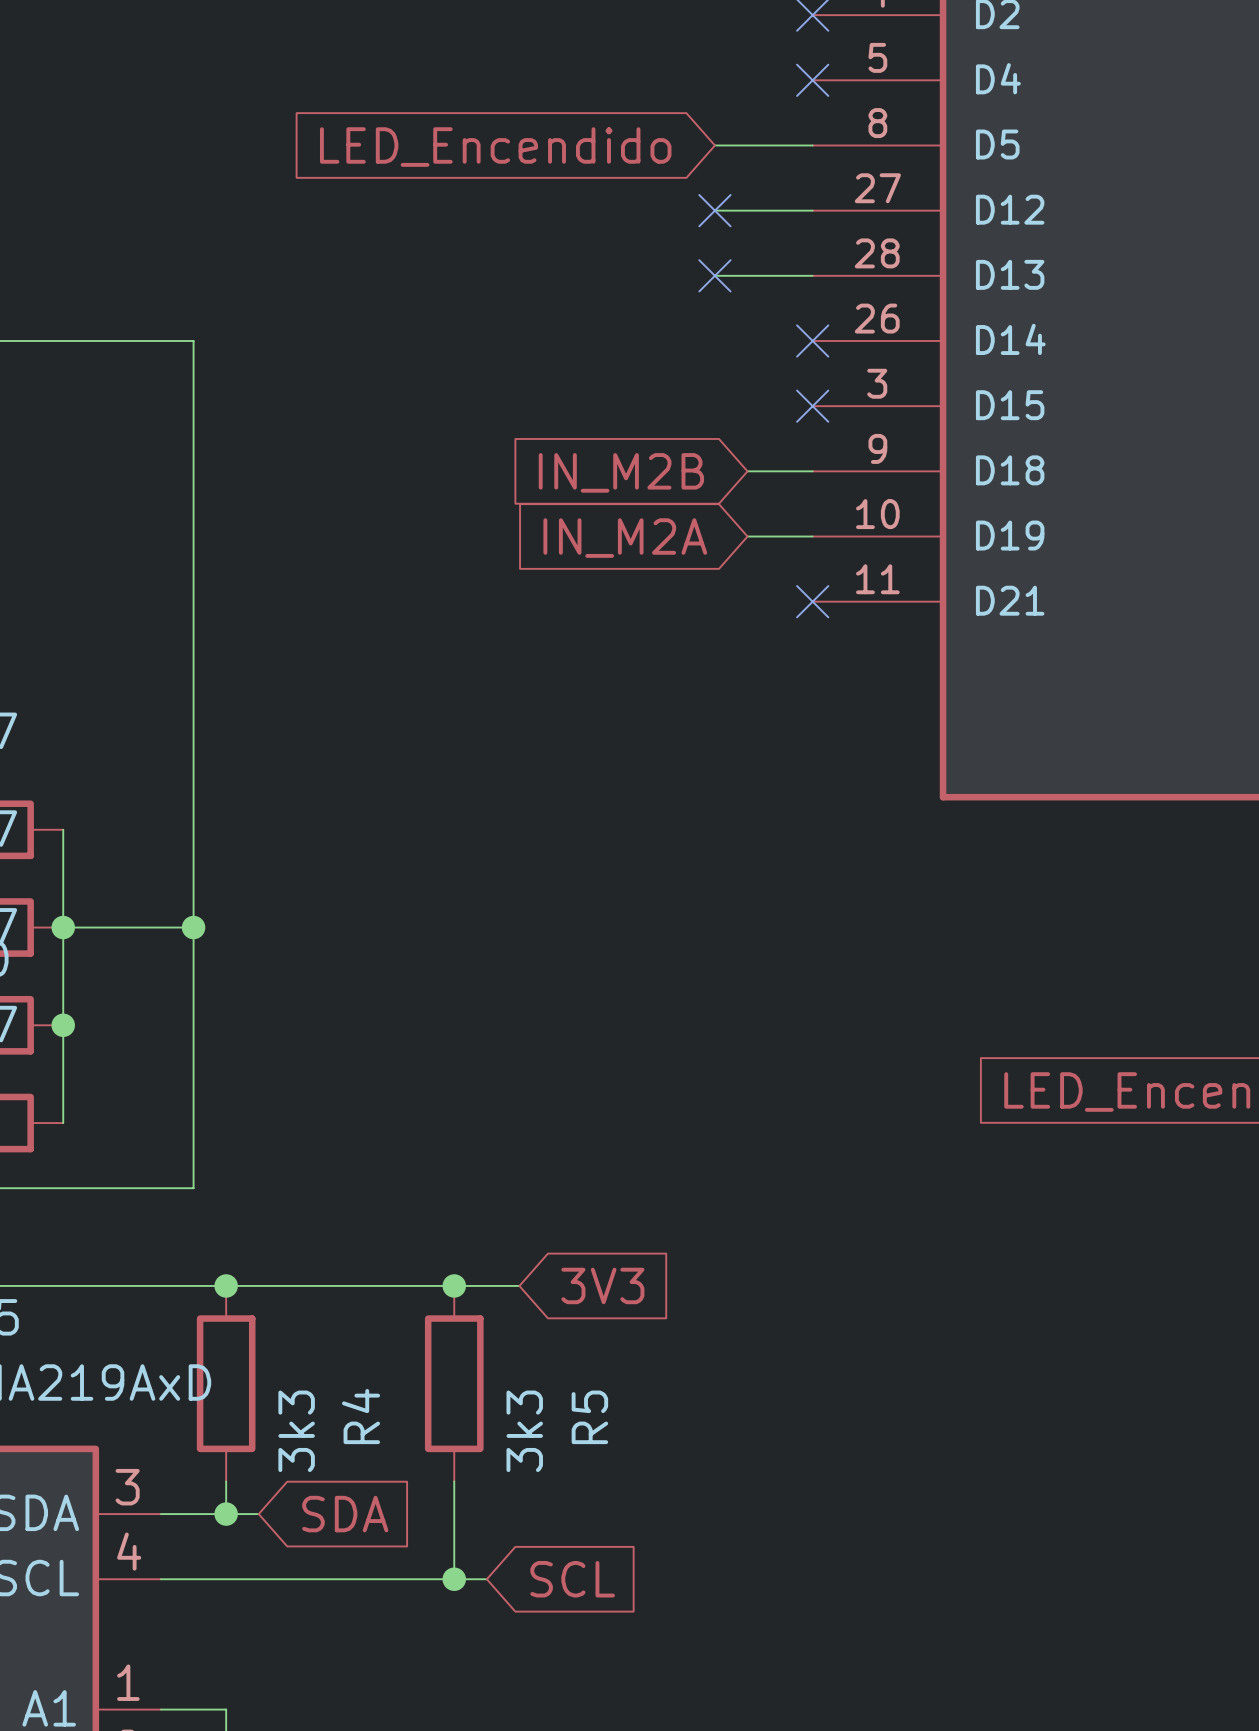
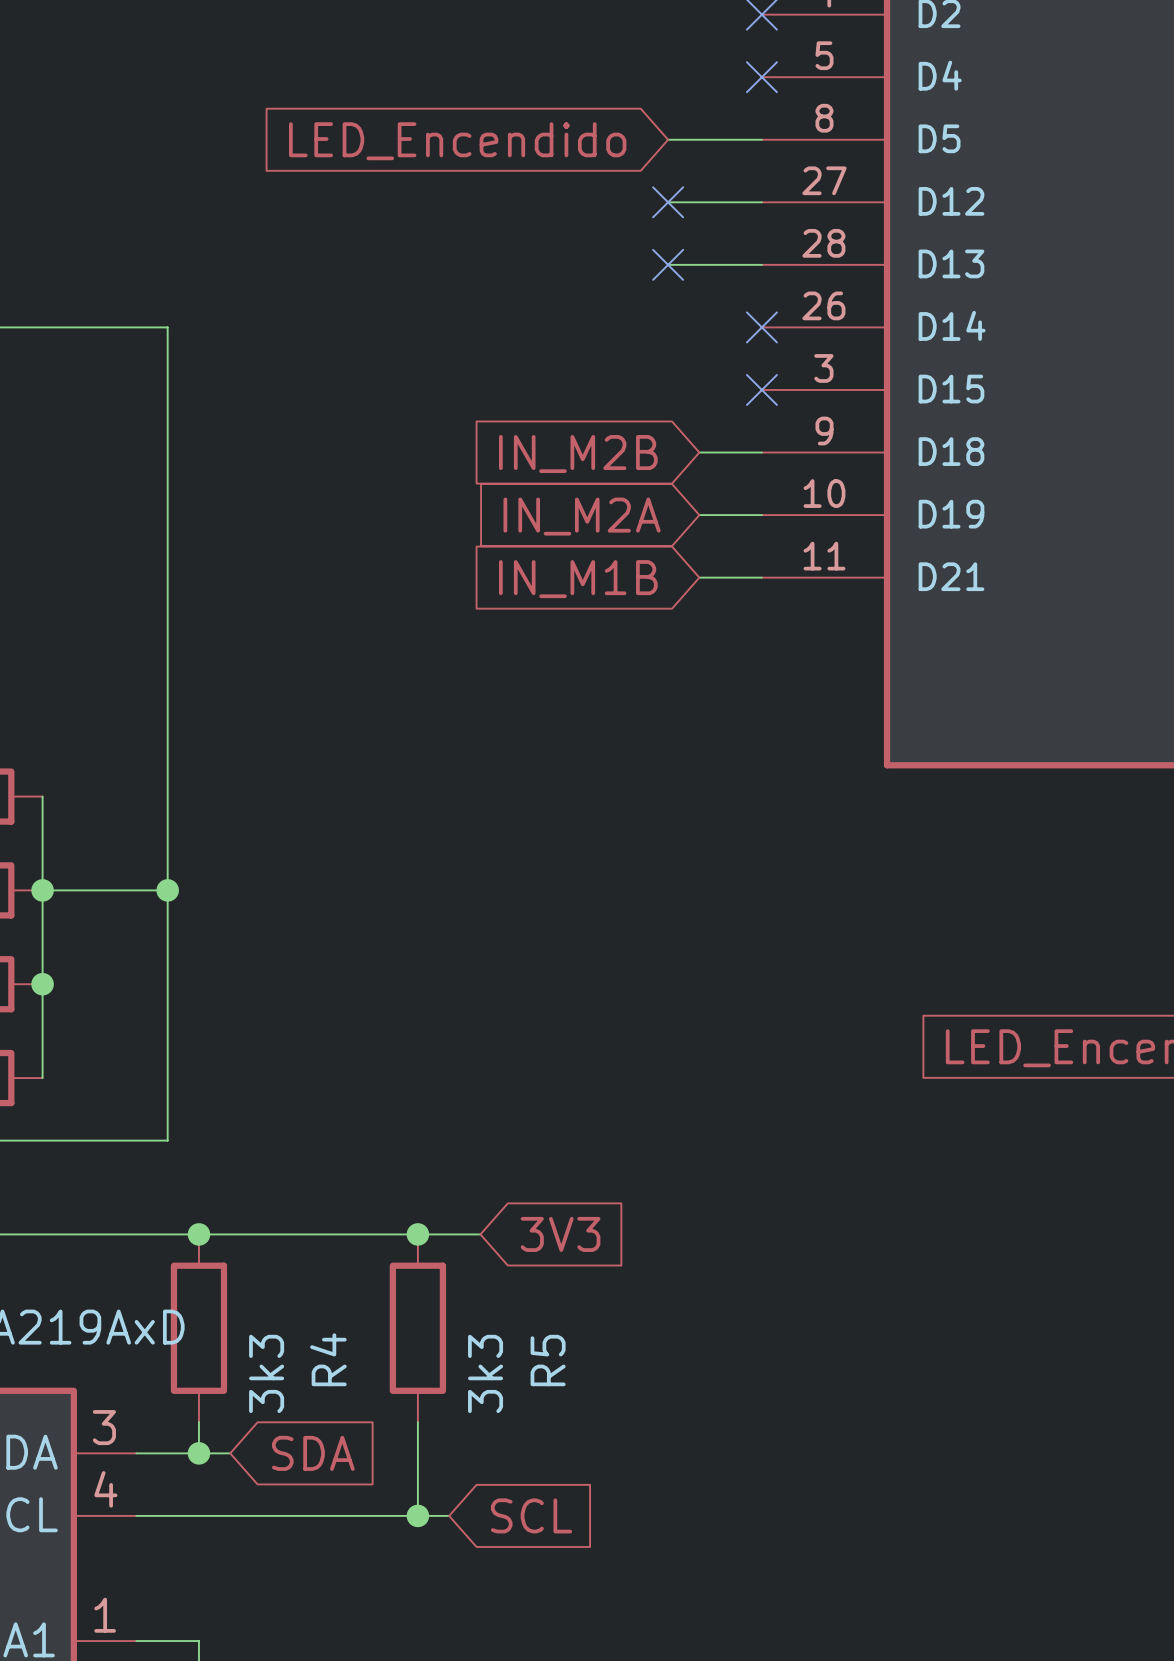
wire: none -> (699, 577) (761, 577)
no-connect mark: (812, 601) -> none
global label: none -> IN_M1B (578, 579)

